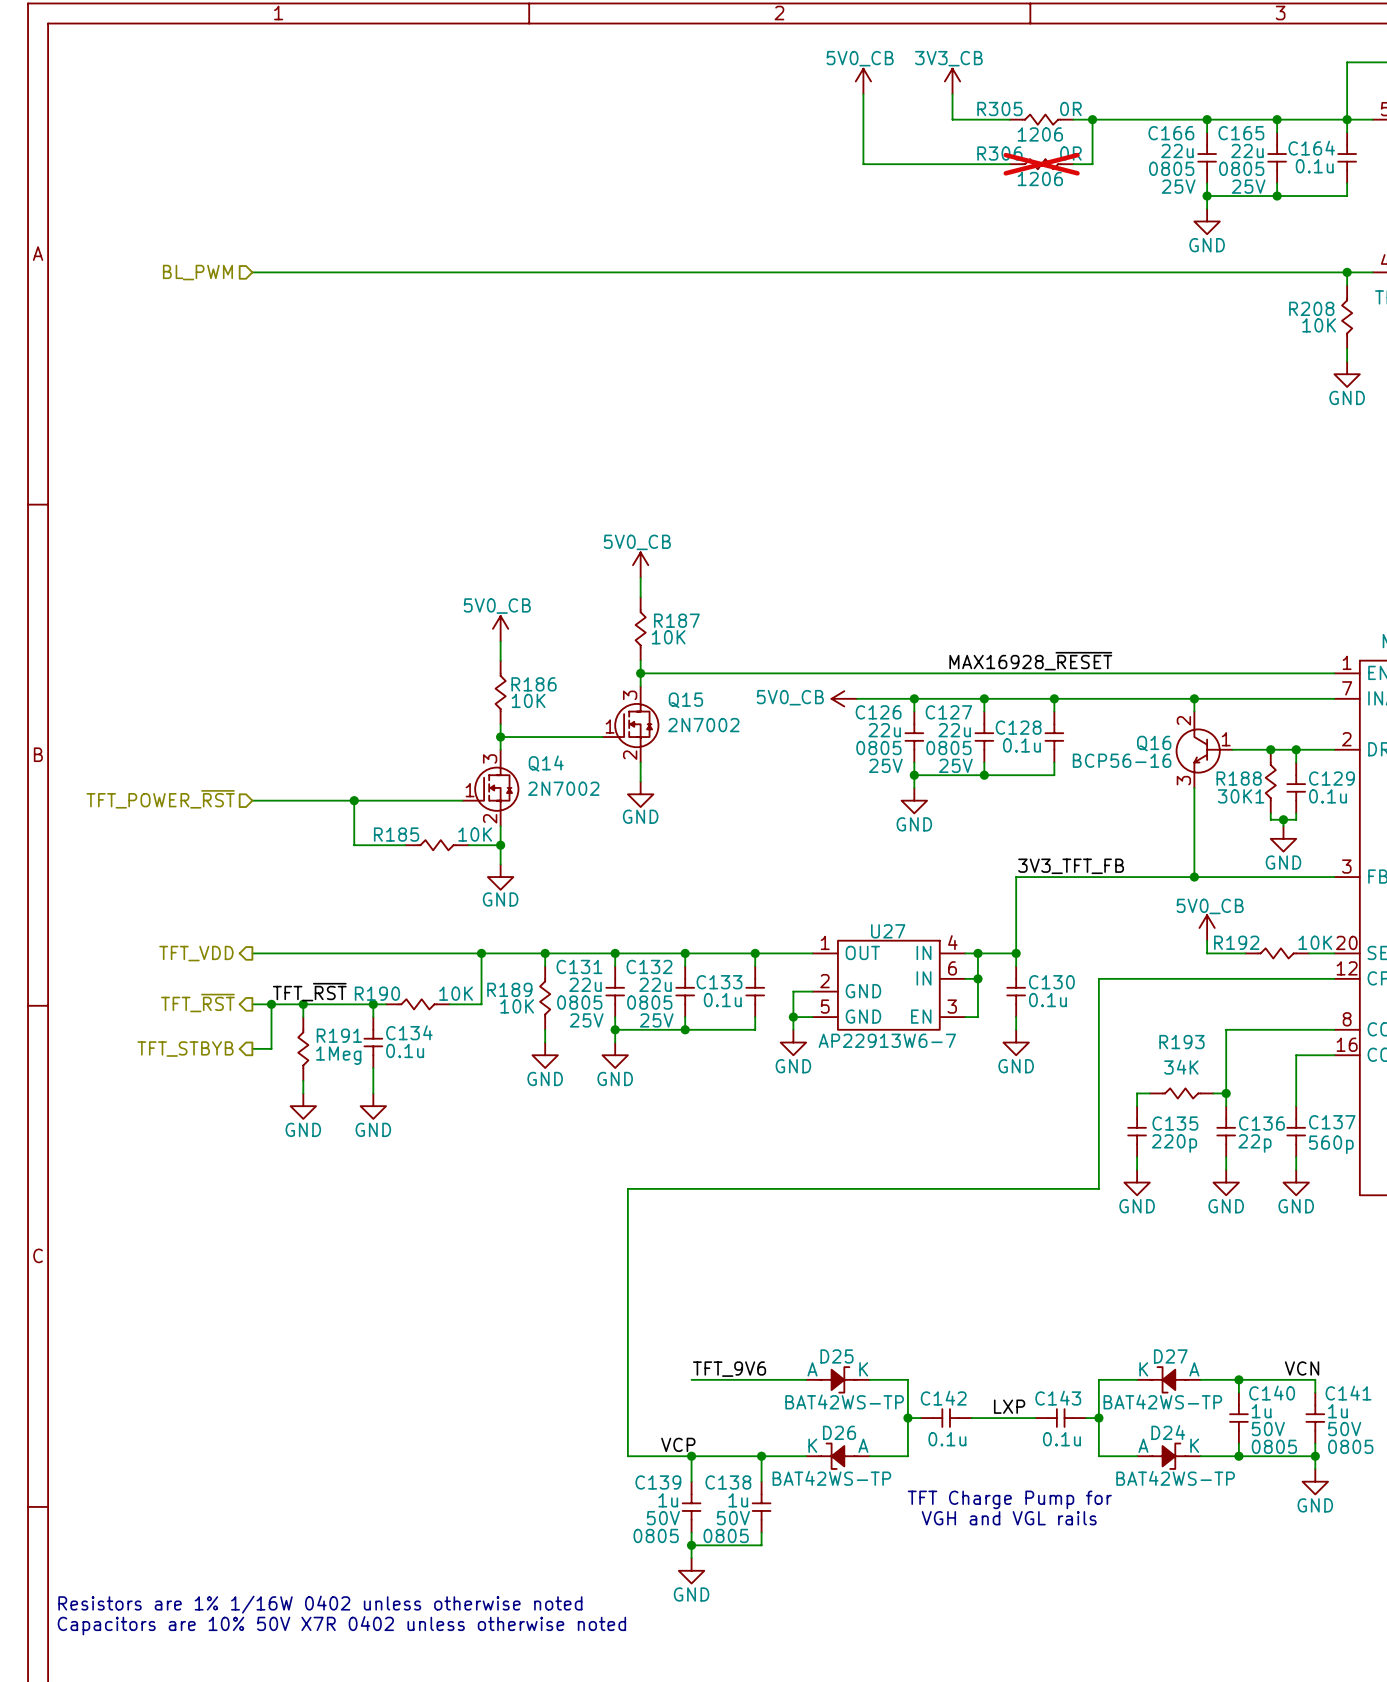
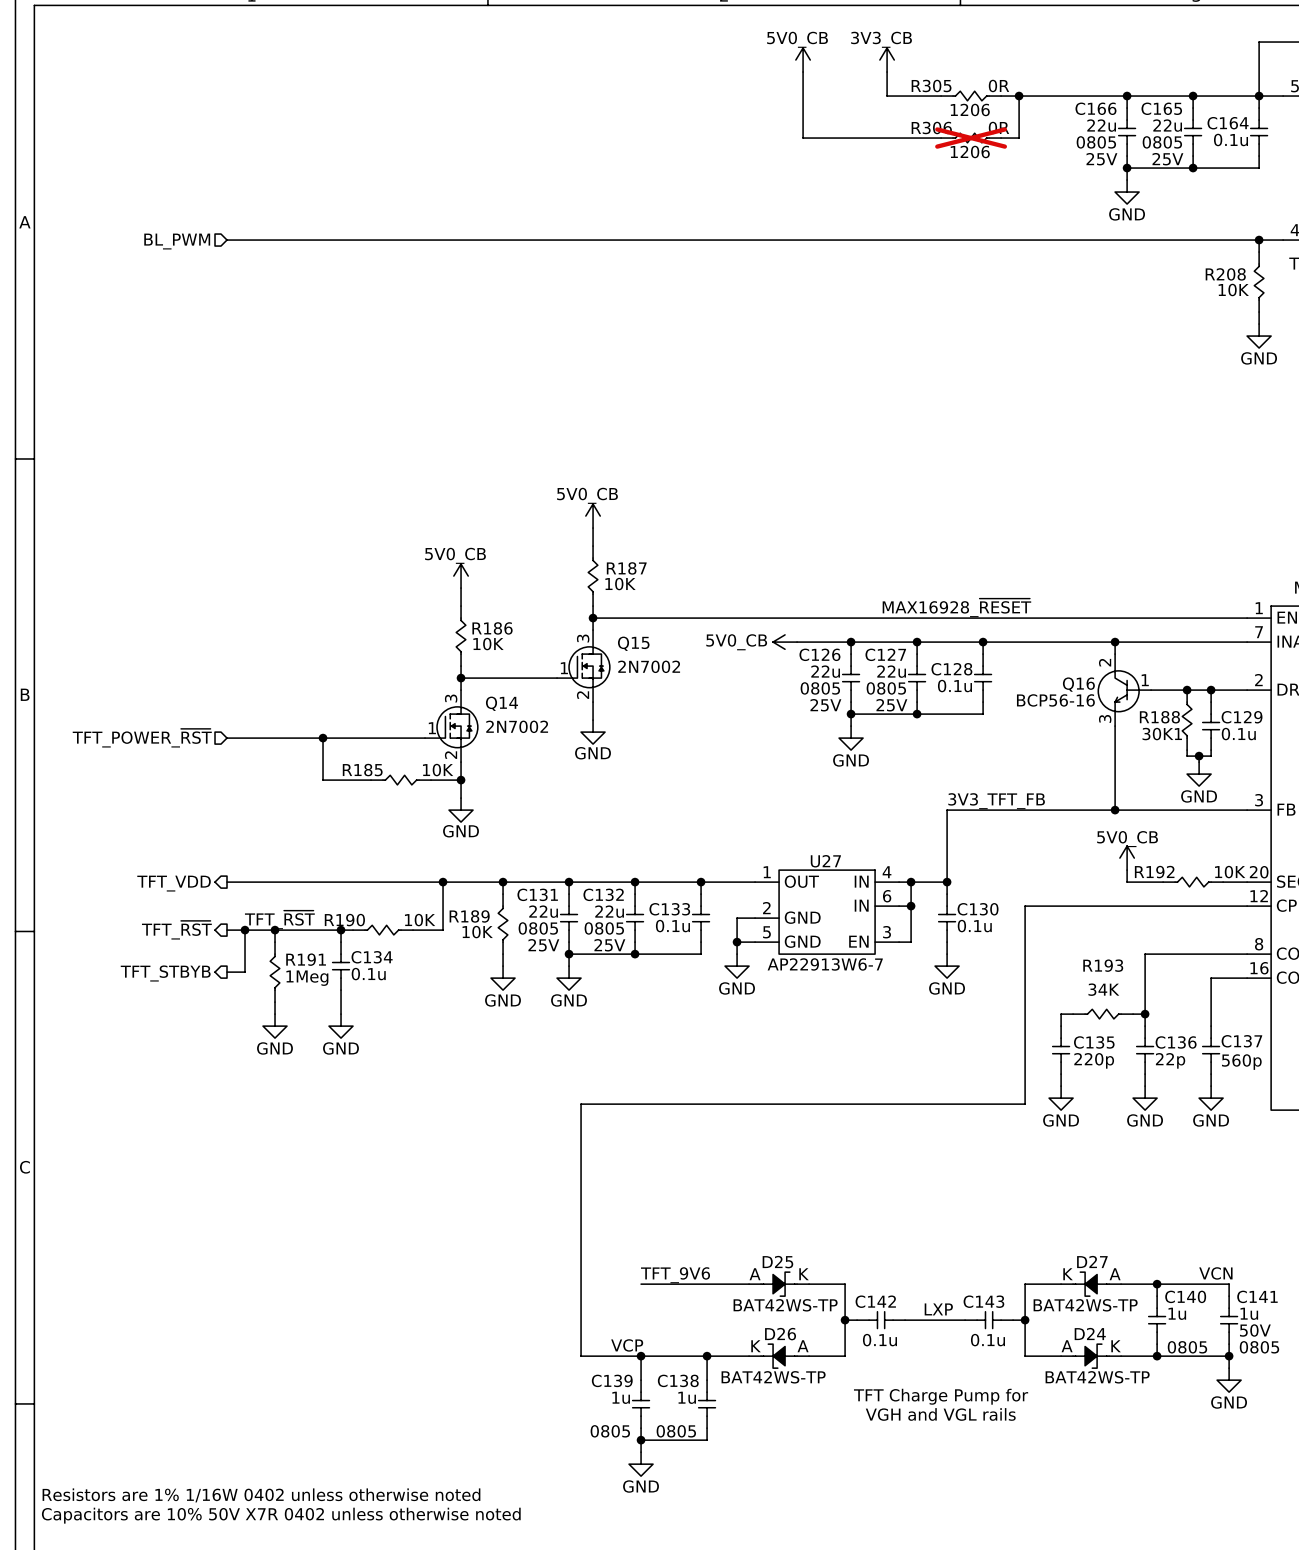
C140 text: 50V (1268, 1429) -> none
C139 text: 50V (663, 1518) -> none
C138 text: 50V (733, 1518) -> none

